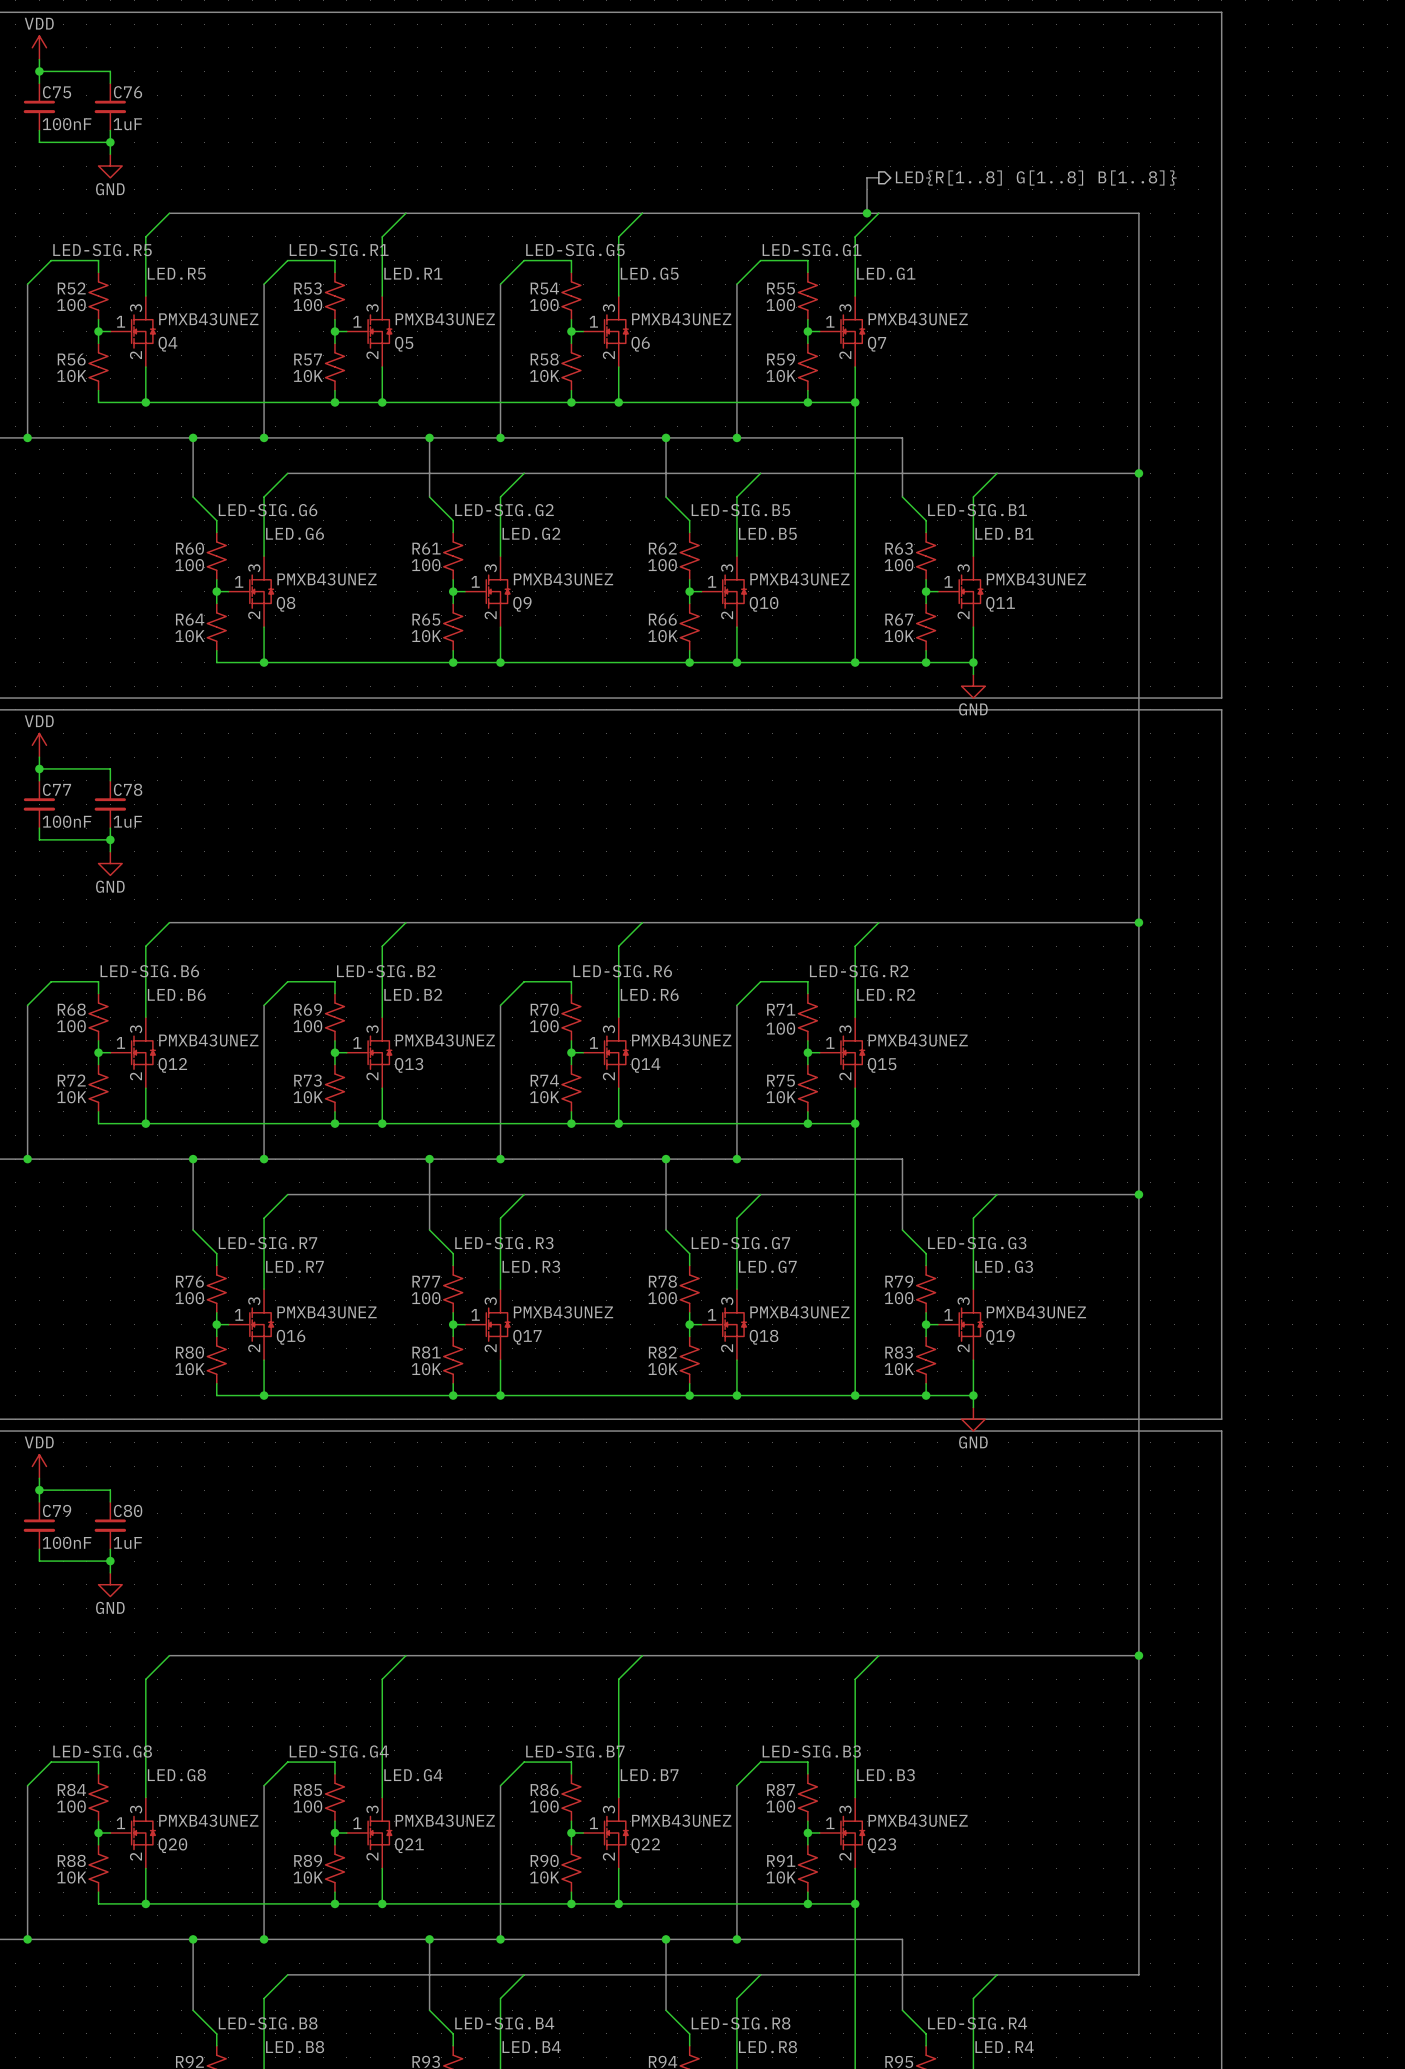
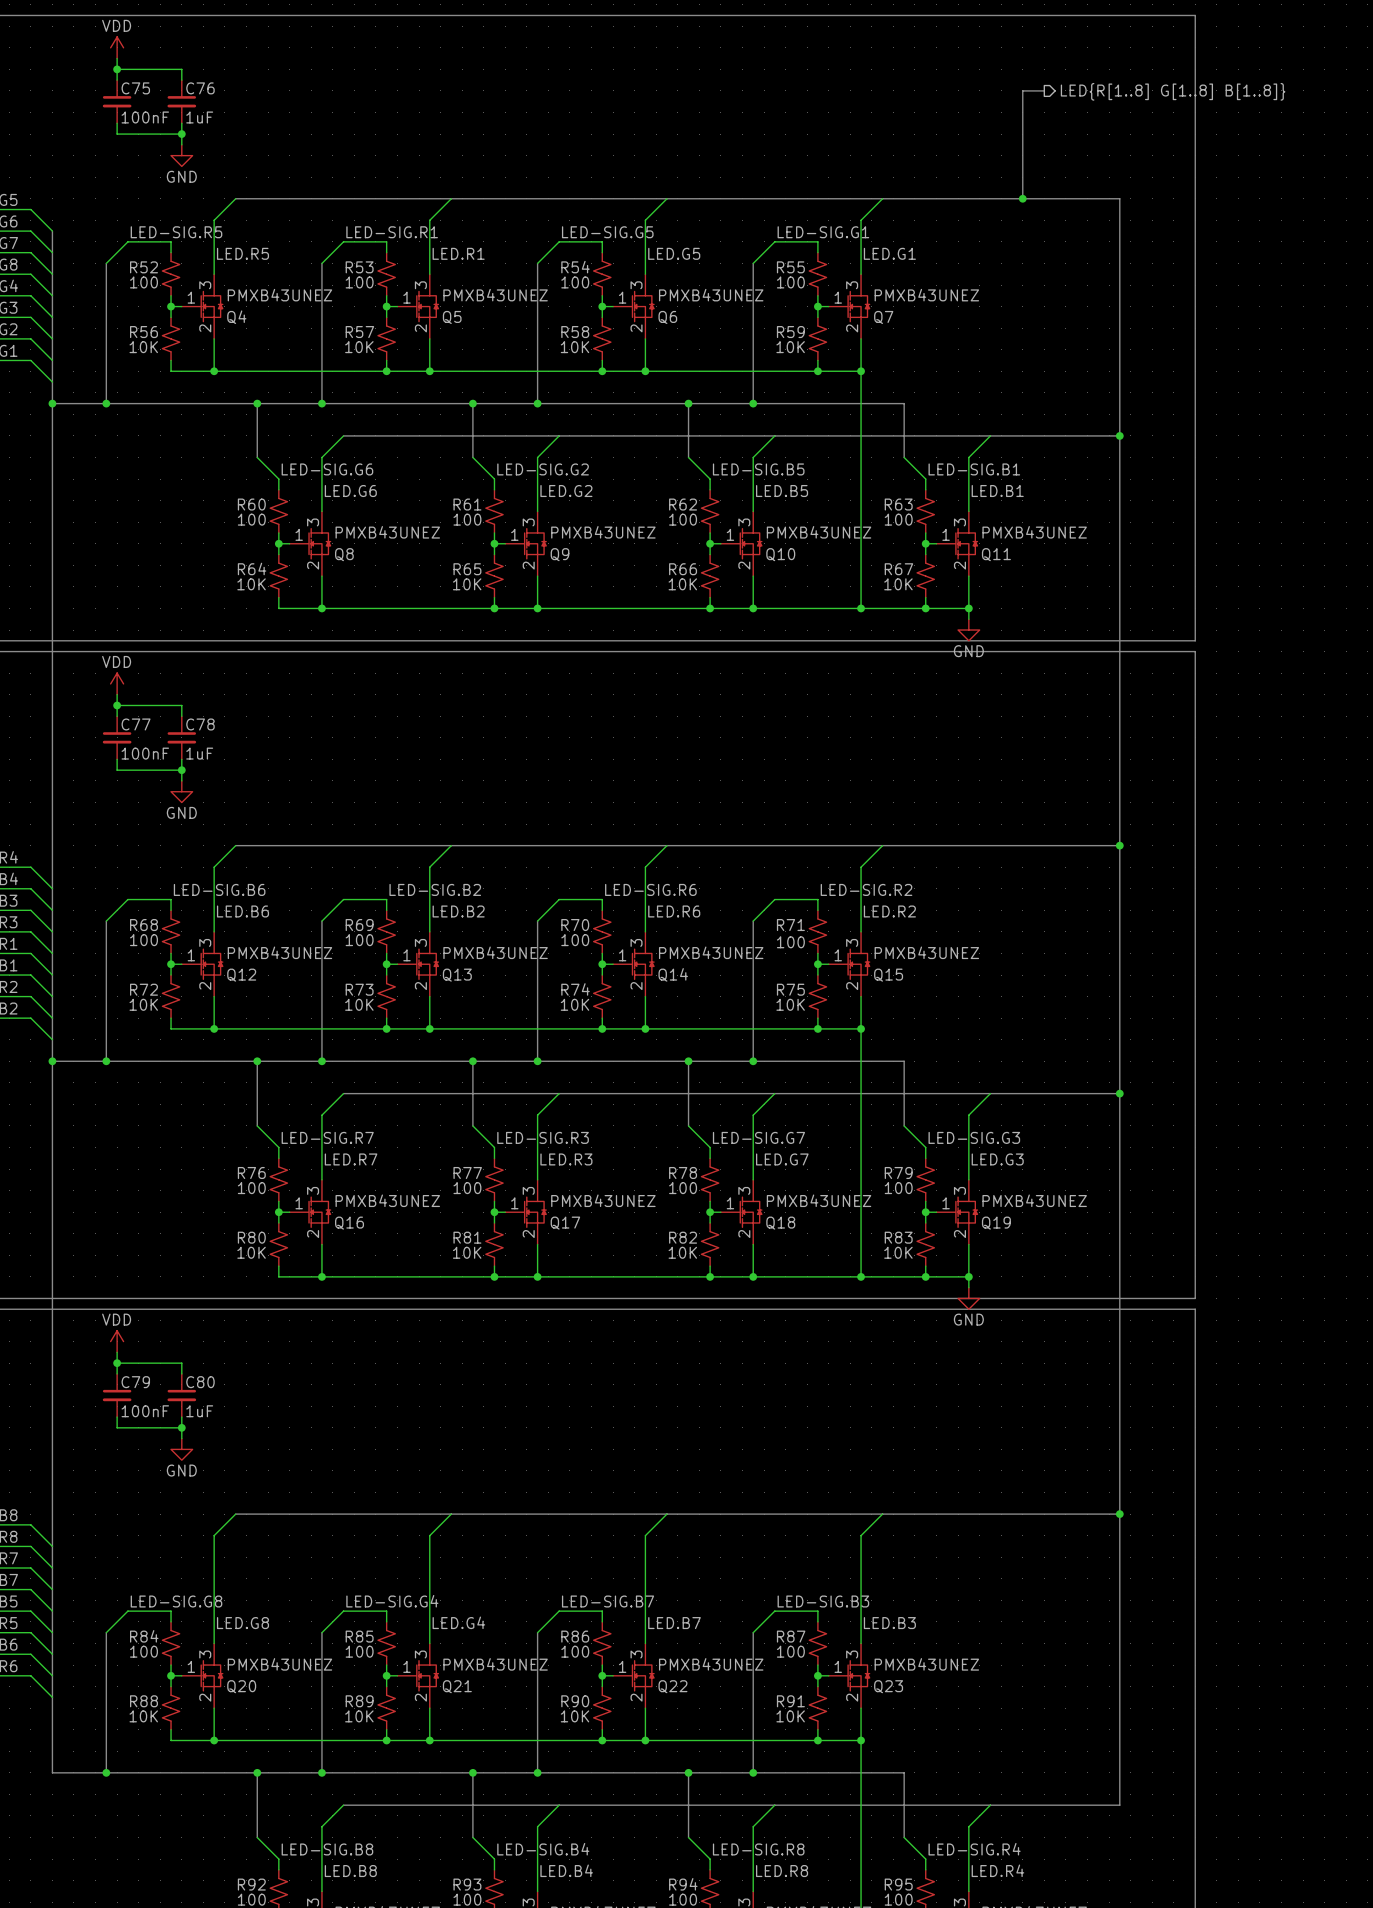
bus: none -> (1044, 90) (1022, 90) (1022, 198)
bus: (878, 177) (867, 177) (867, 213) -> none
hierarchical label position: LED{R[1..8] G[1..8] B[1..8]} (1036, 178) -> LED{R[1..8] G[1..8] B[1..8]} (1173, 91)
junction: (867, 213) -> none
junction: none -> (1022, 198)

